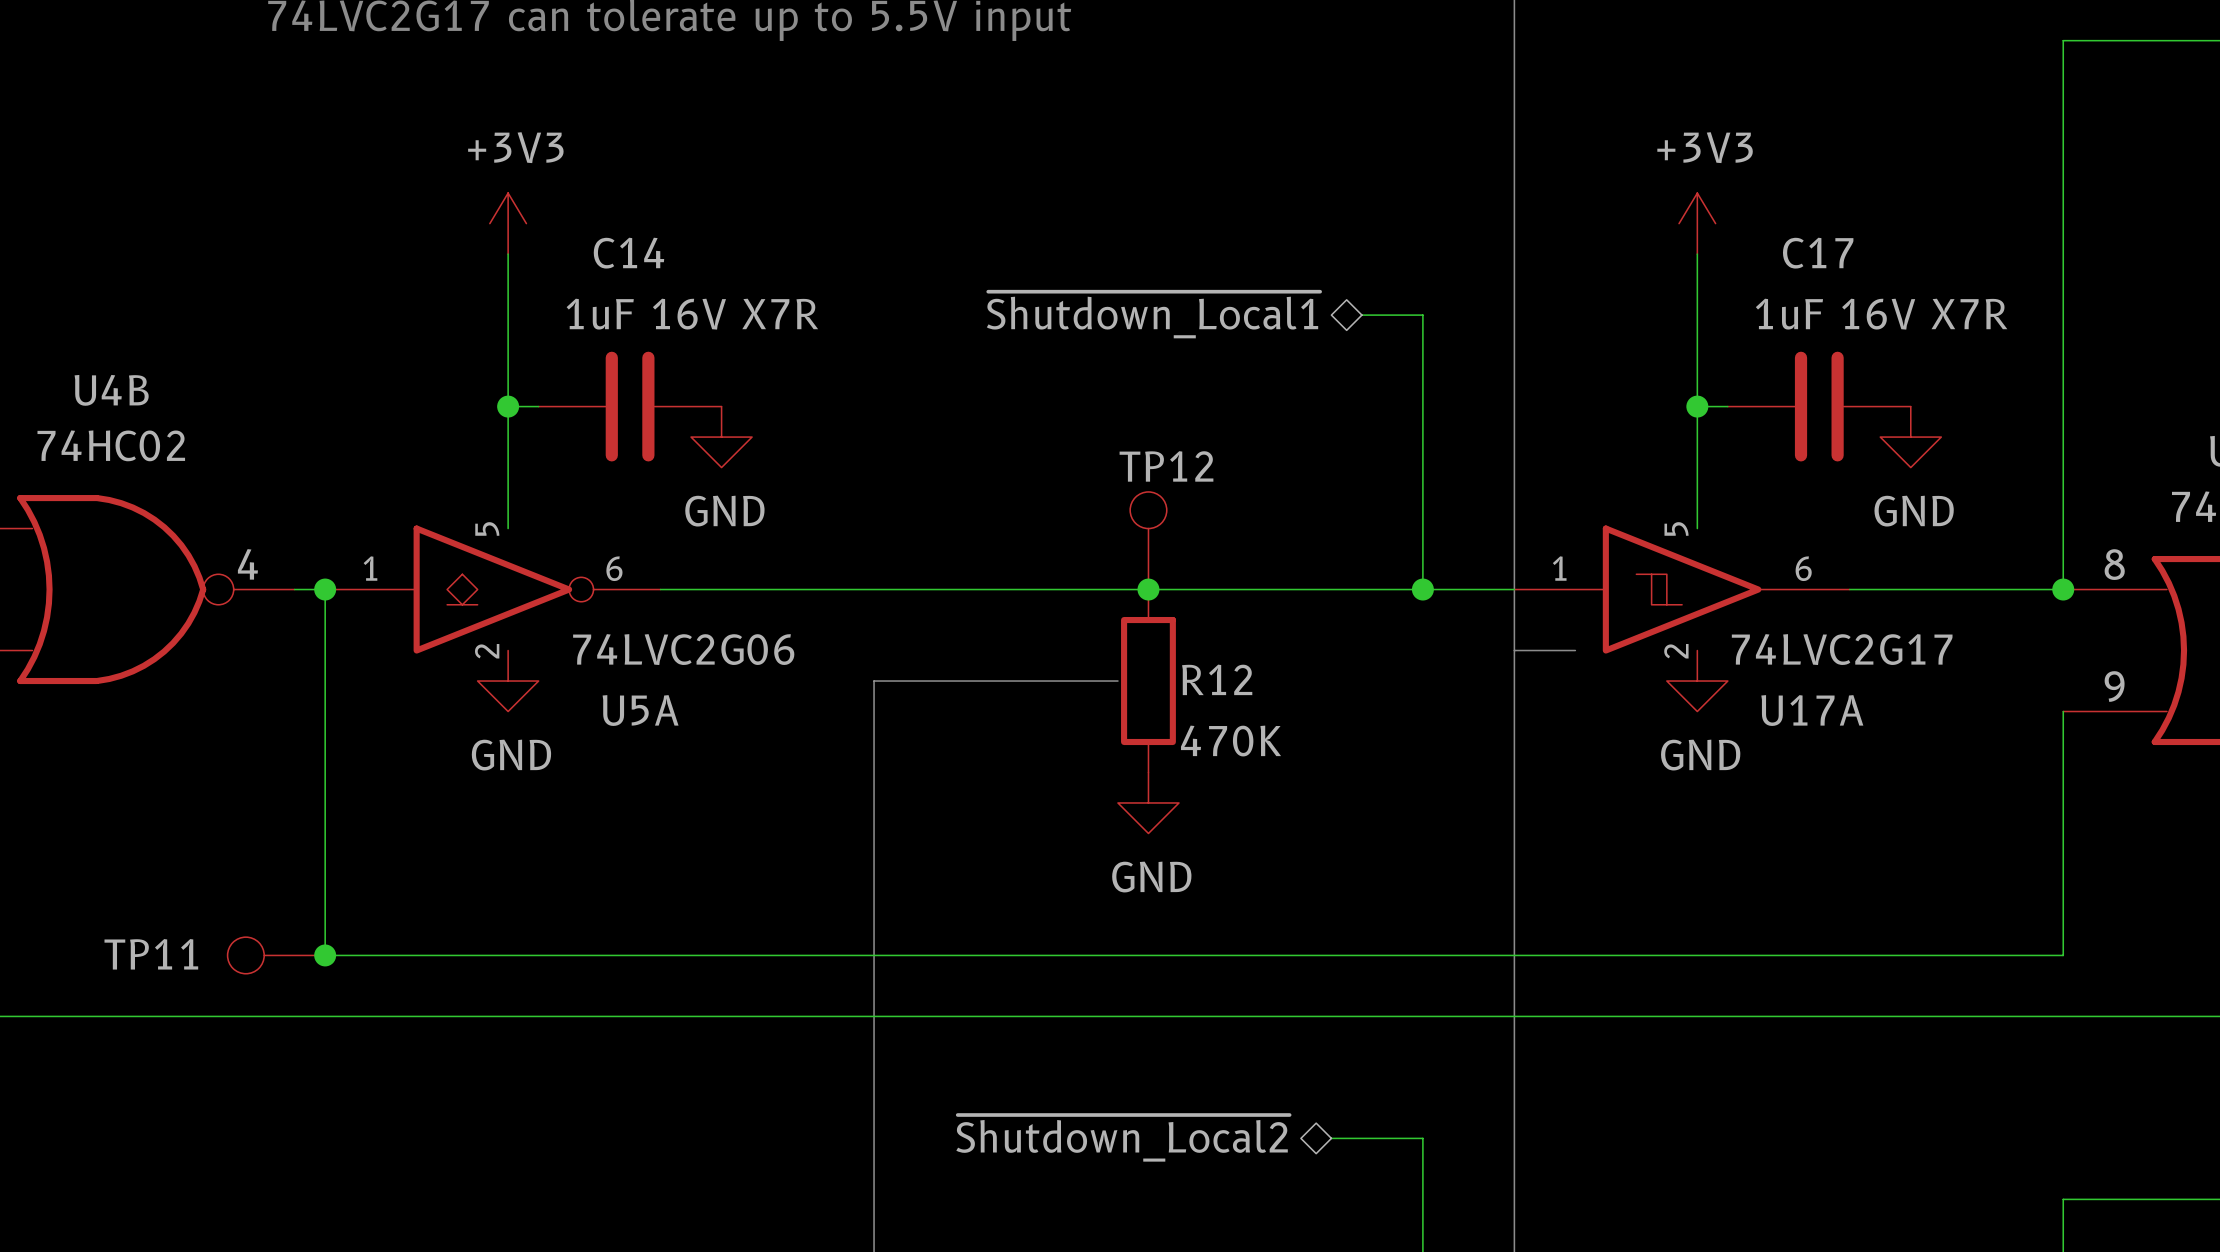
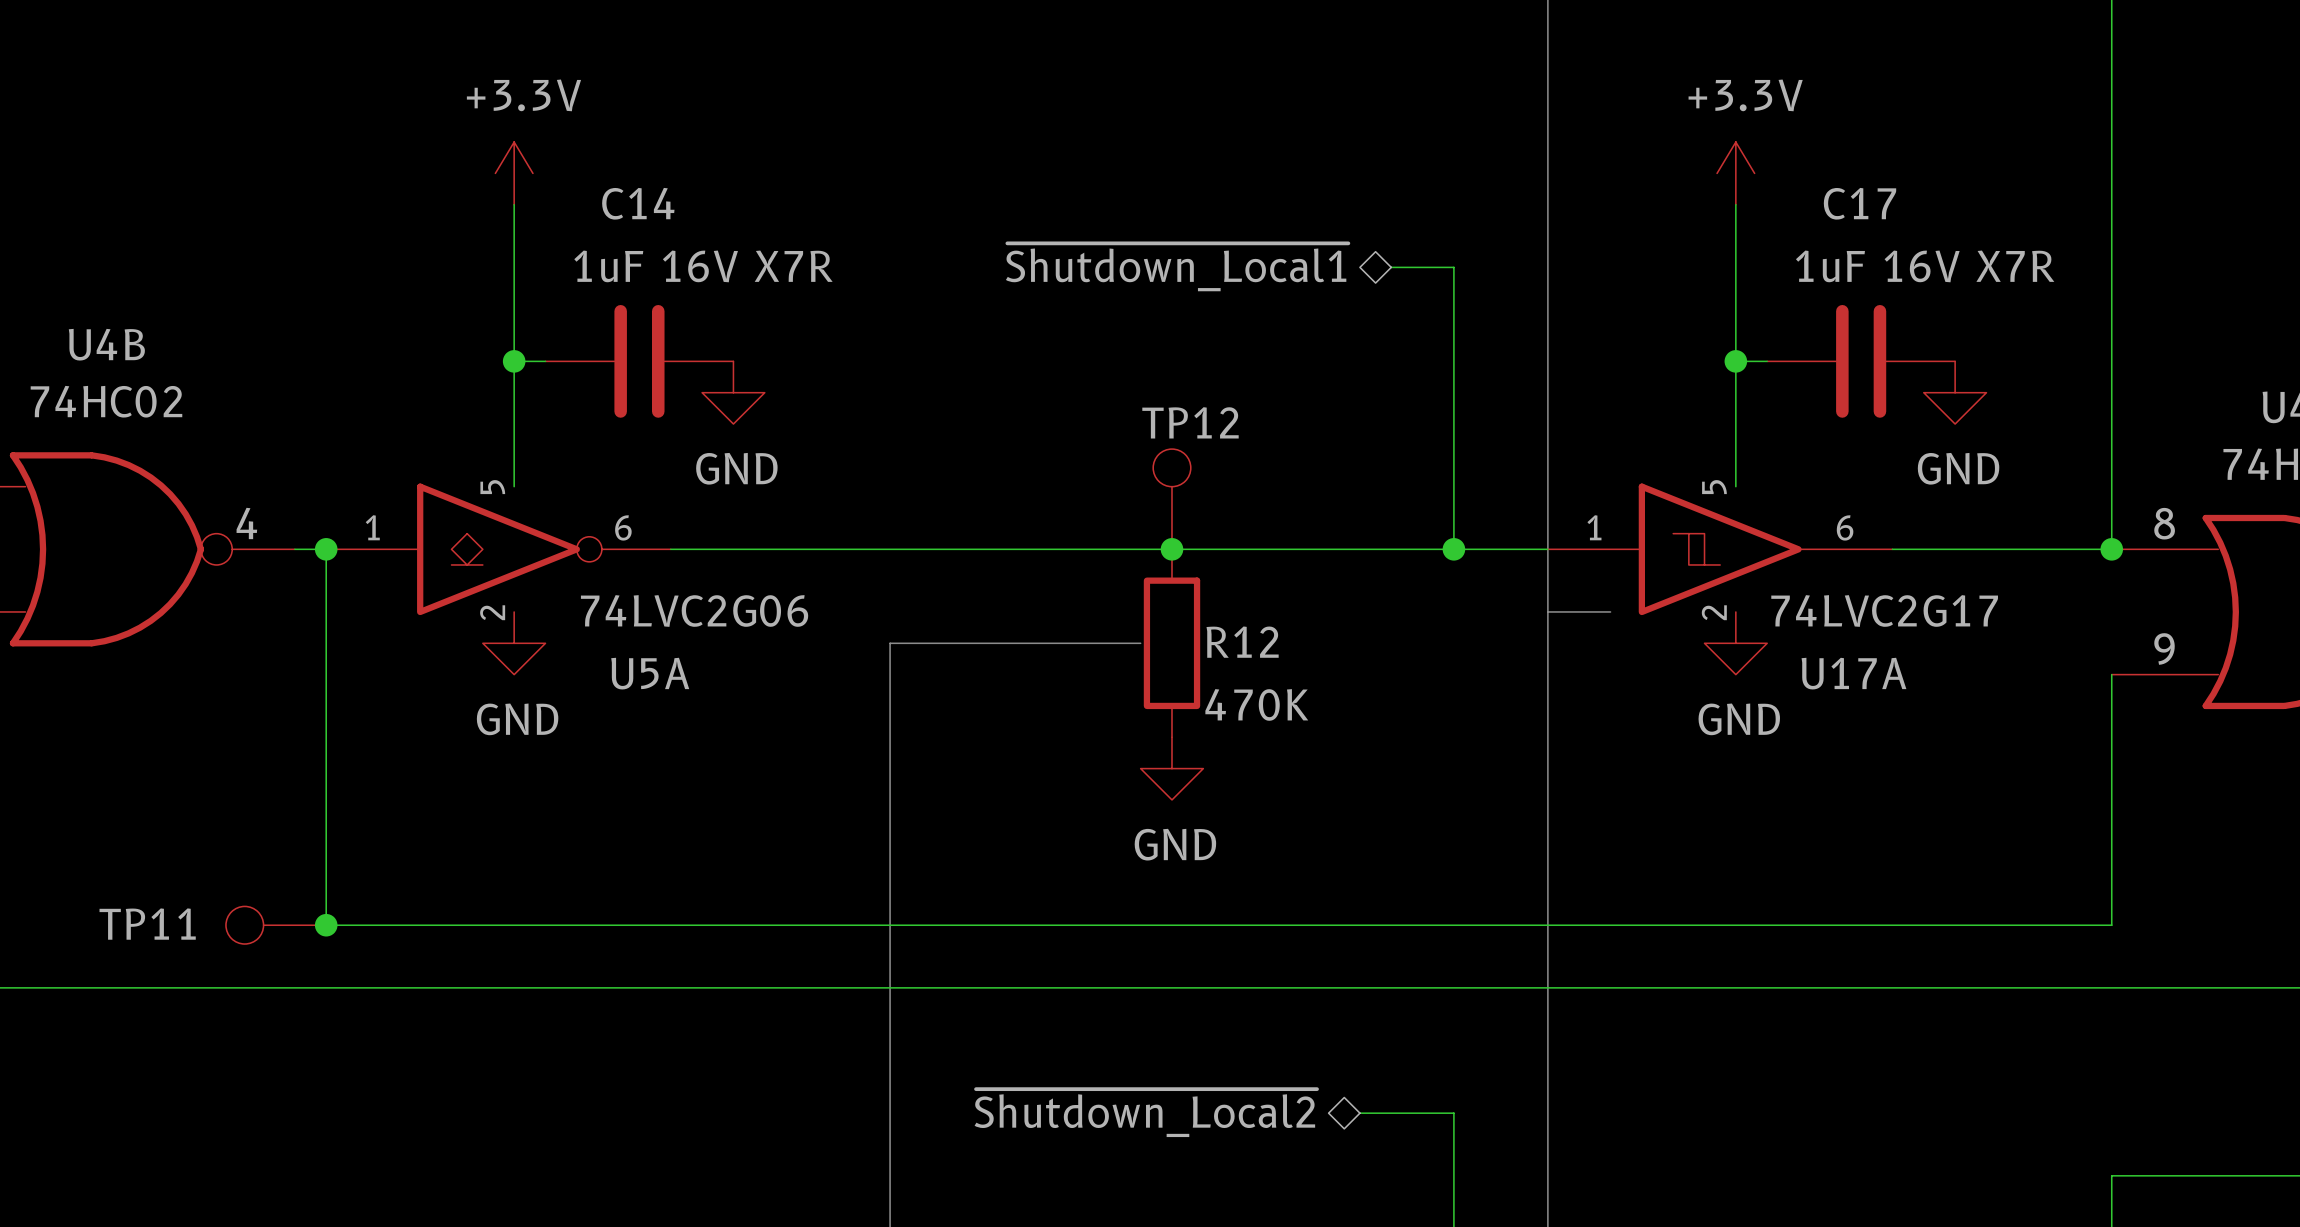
power symbol: +3V3 (508, 223) -> +3.3V (514, 173)
power symbol: +3V3 (1697, 223) -> +3.3V (1735, 173)

